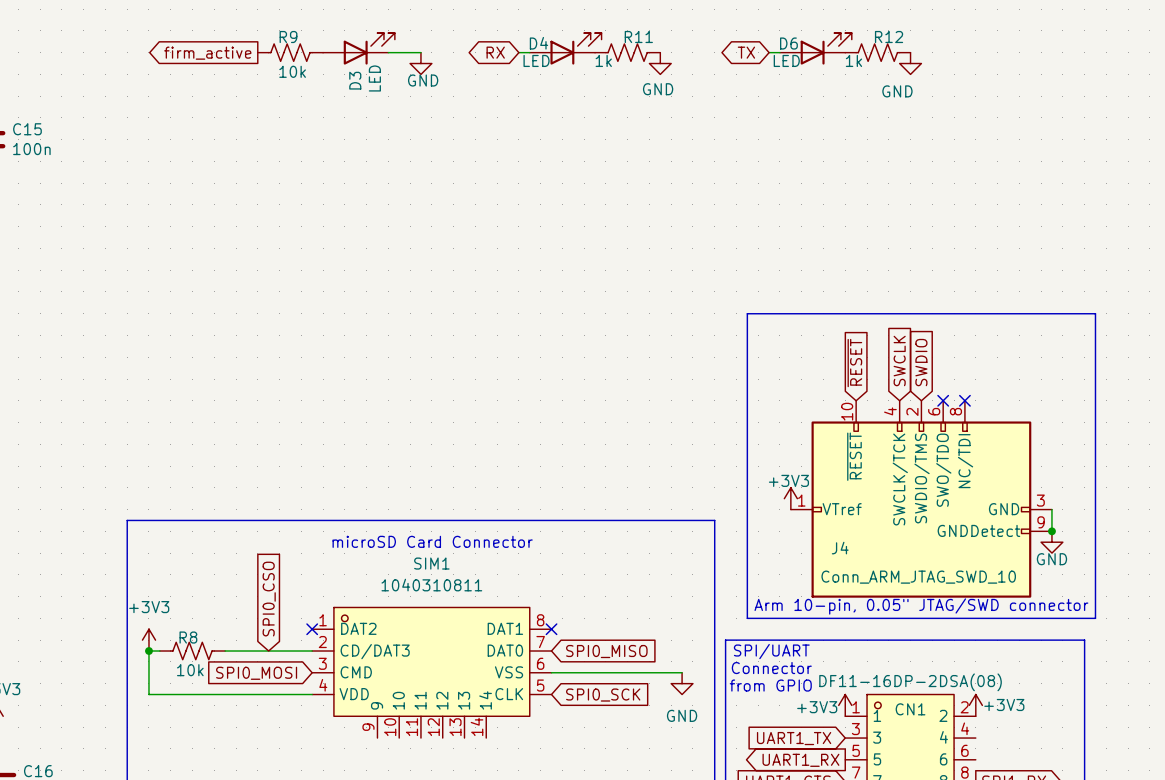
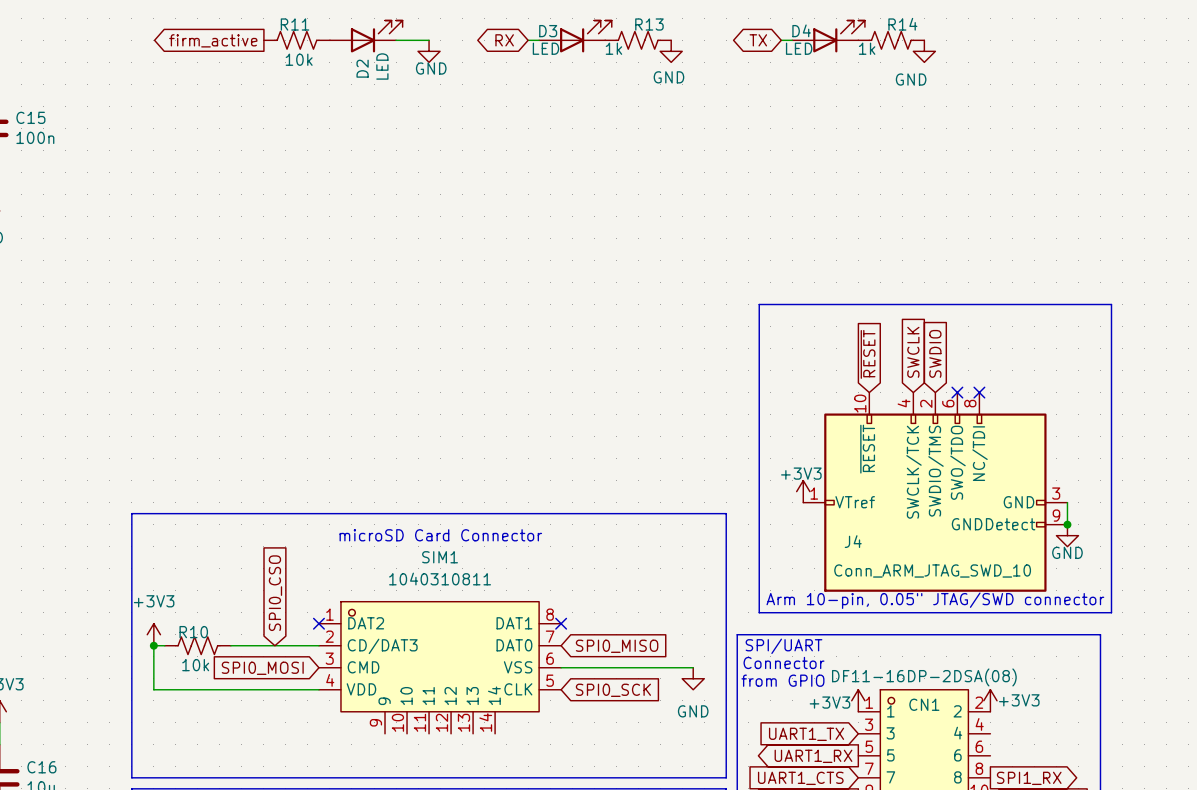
R9 name: R9 (288, 37) -> R11 (295, 24)
R11 name: R11 (638, 37) -> R13 (649, 24)
R12 name: R12 (889, 37) -> R14 (902, 24)
D4 name: D4 (538, 43) -> D3 (548, 31)
D6 name: D6 (788, 43) -> D4 (801, 30)
D3 name: D3 (355, 80) -> D2 (362, 68)
R8 name: R8 (188, 637) -> R10 (193, 632)

